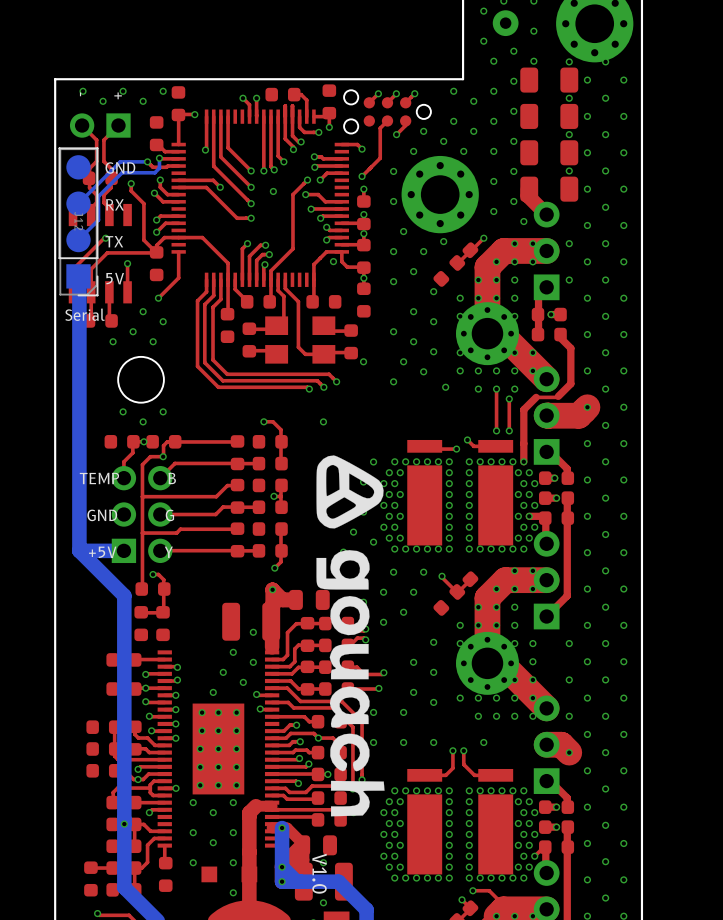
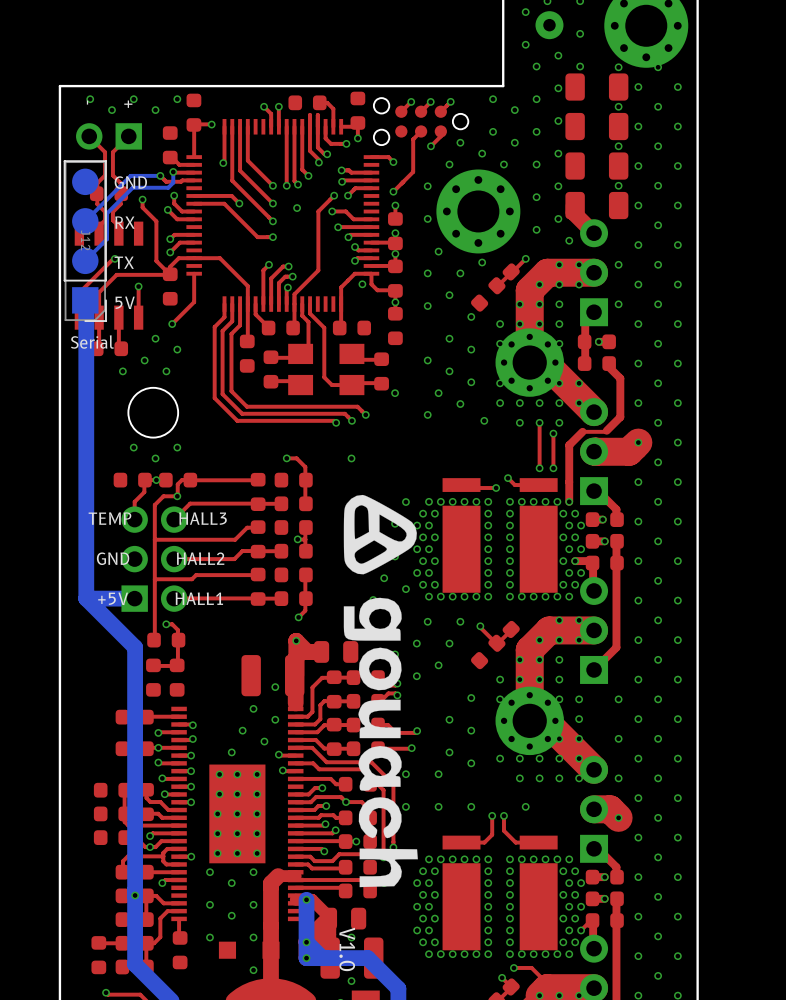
text: TEMP B (127, 478) -> TEMP HALL3 (157, 518)
text: GND G (130, 515) -> GND HALL2 (160, 558)
text: +5V Y (130, 552) -> +5V HALL1 (160, 598)

